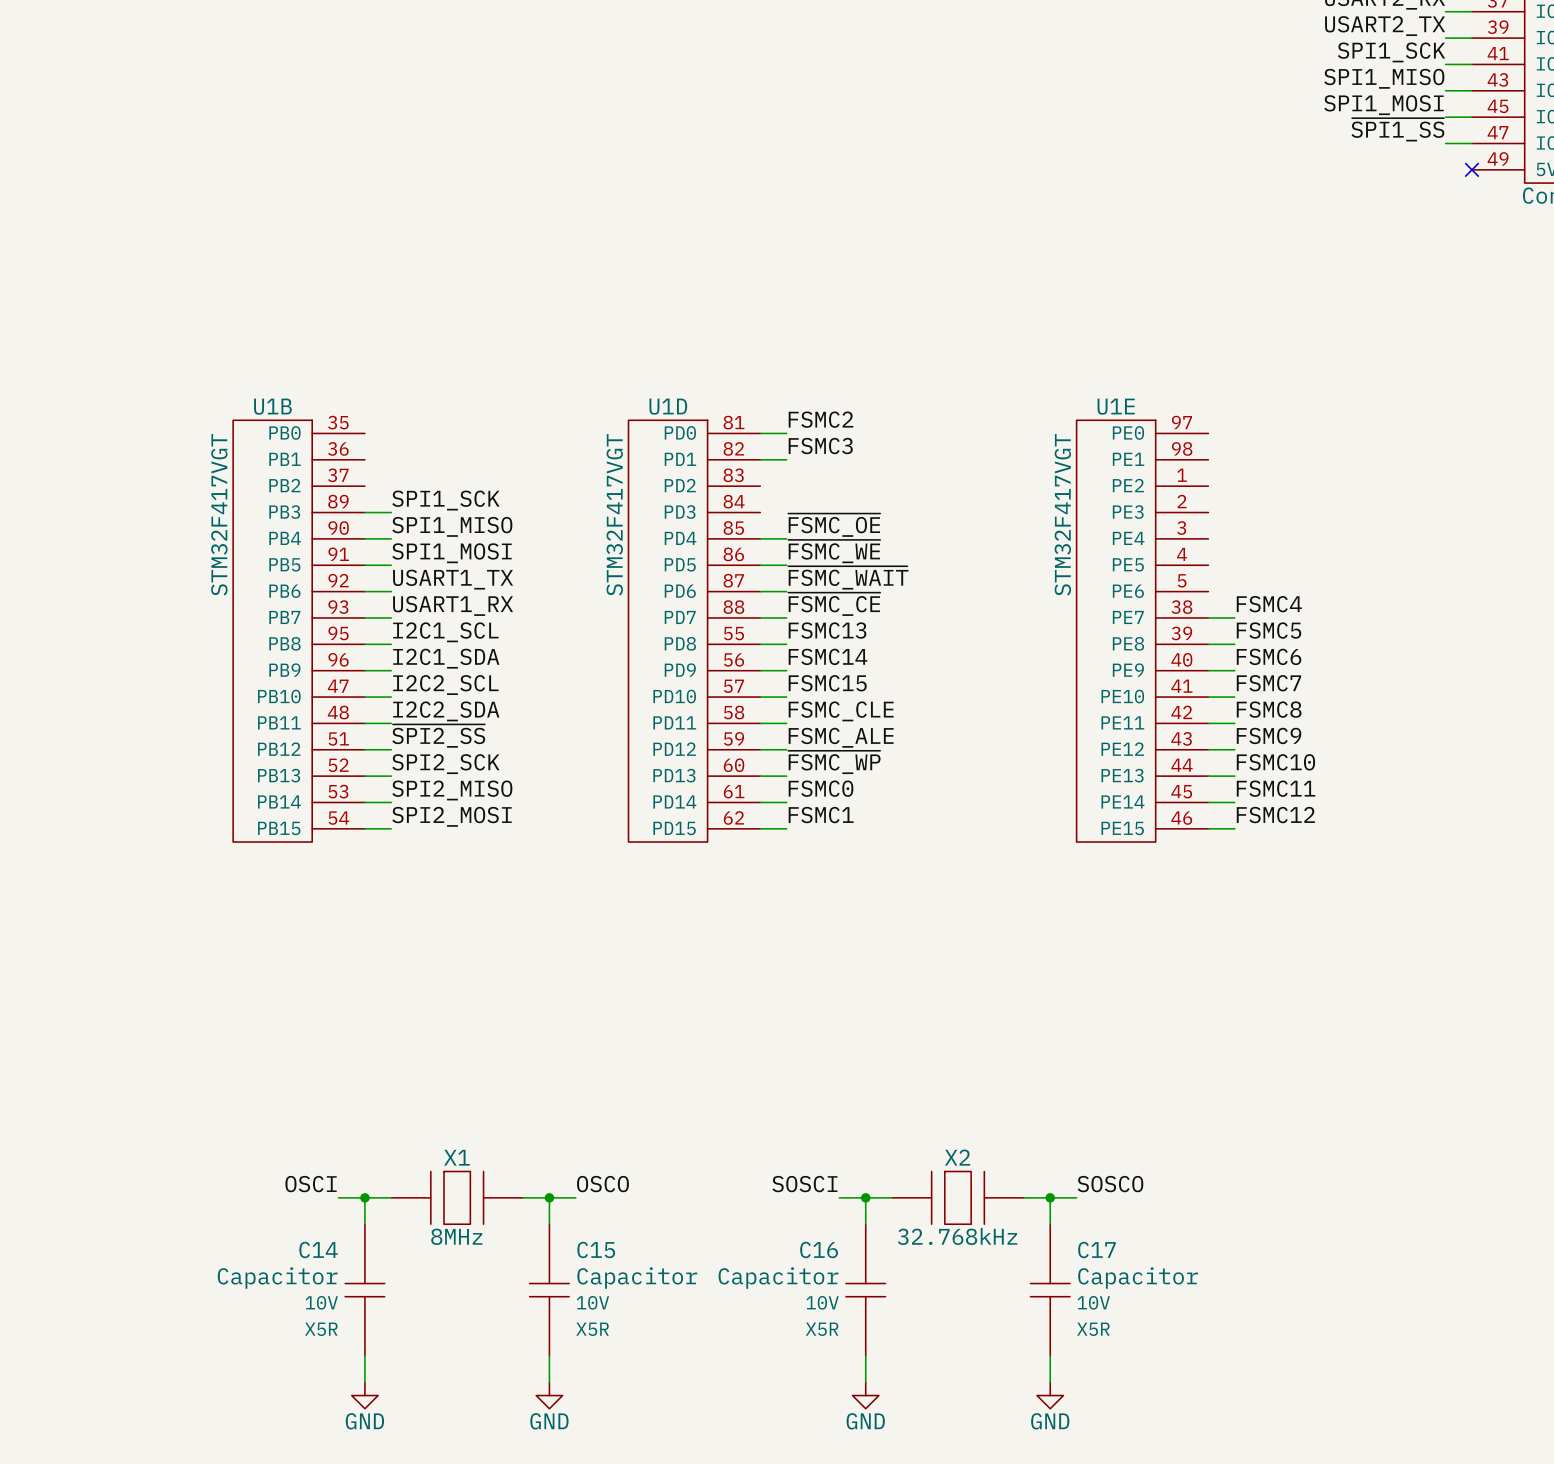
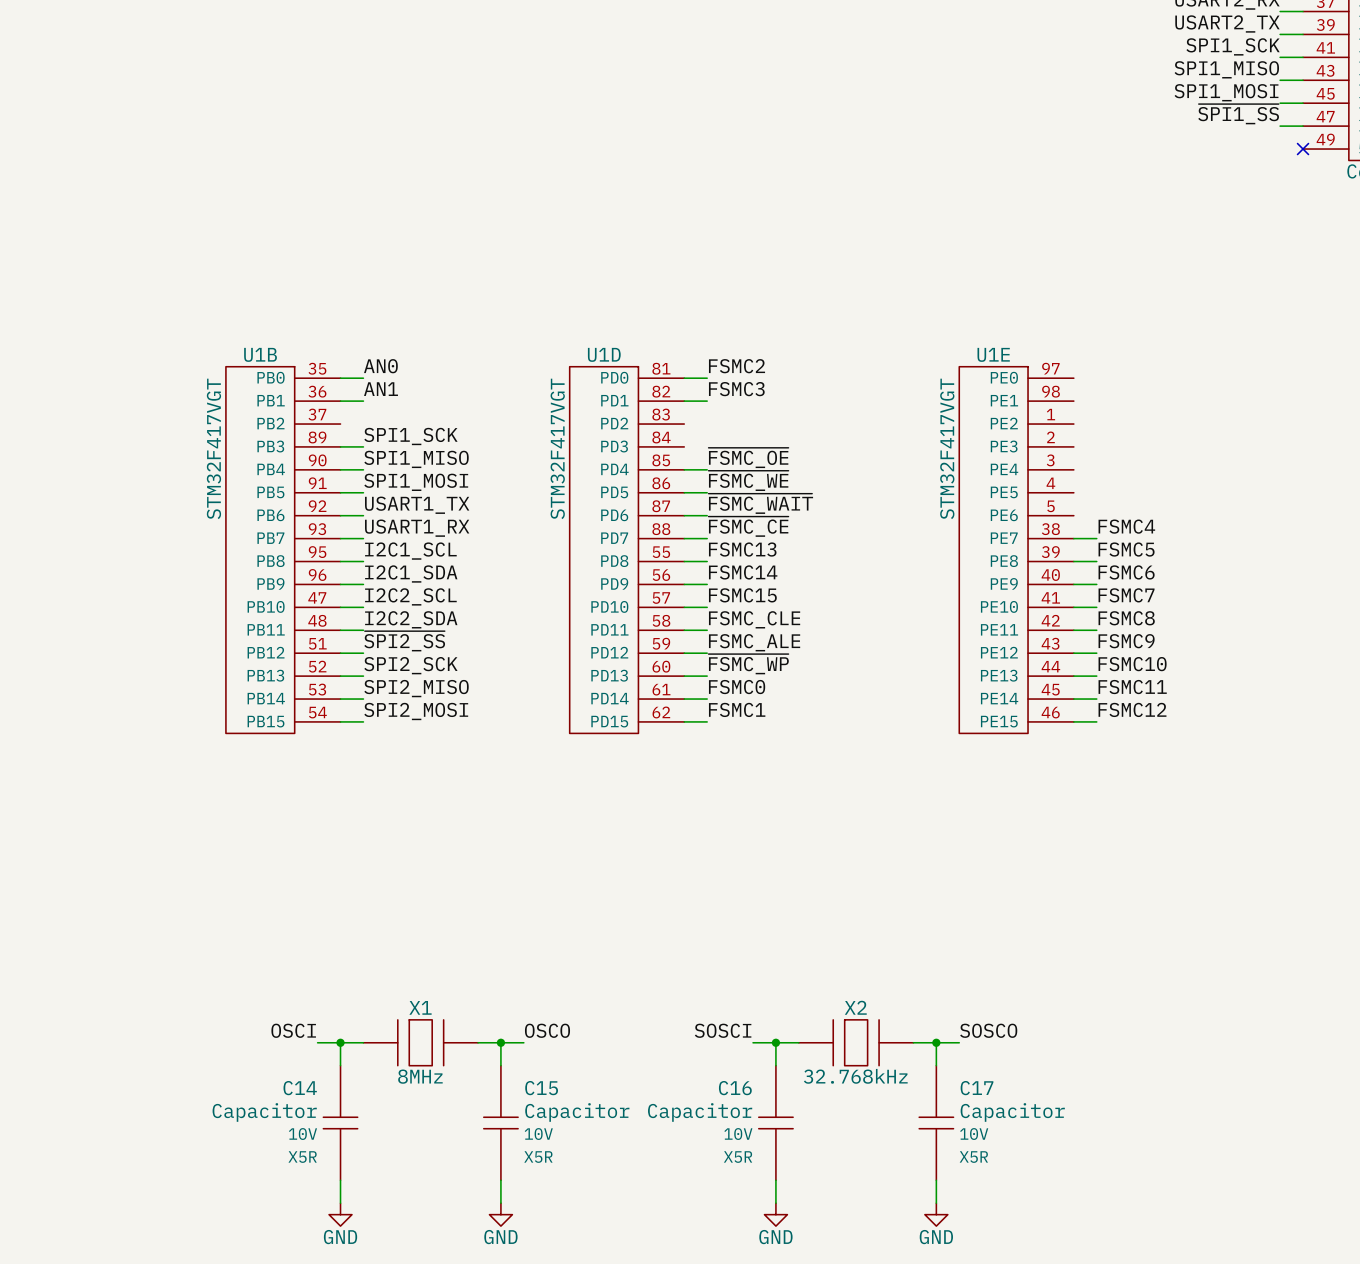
label: none -> AN0 (380, 366)
wire: none -> (340, 378) (363, 378)
label: none -> AN1 (381, 389)
wire: none -> (340, 401) (363, 401)

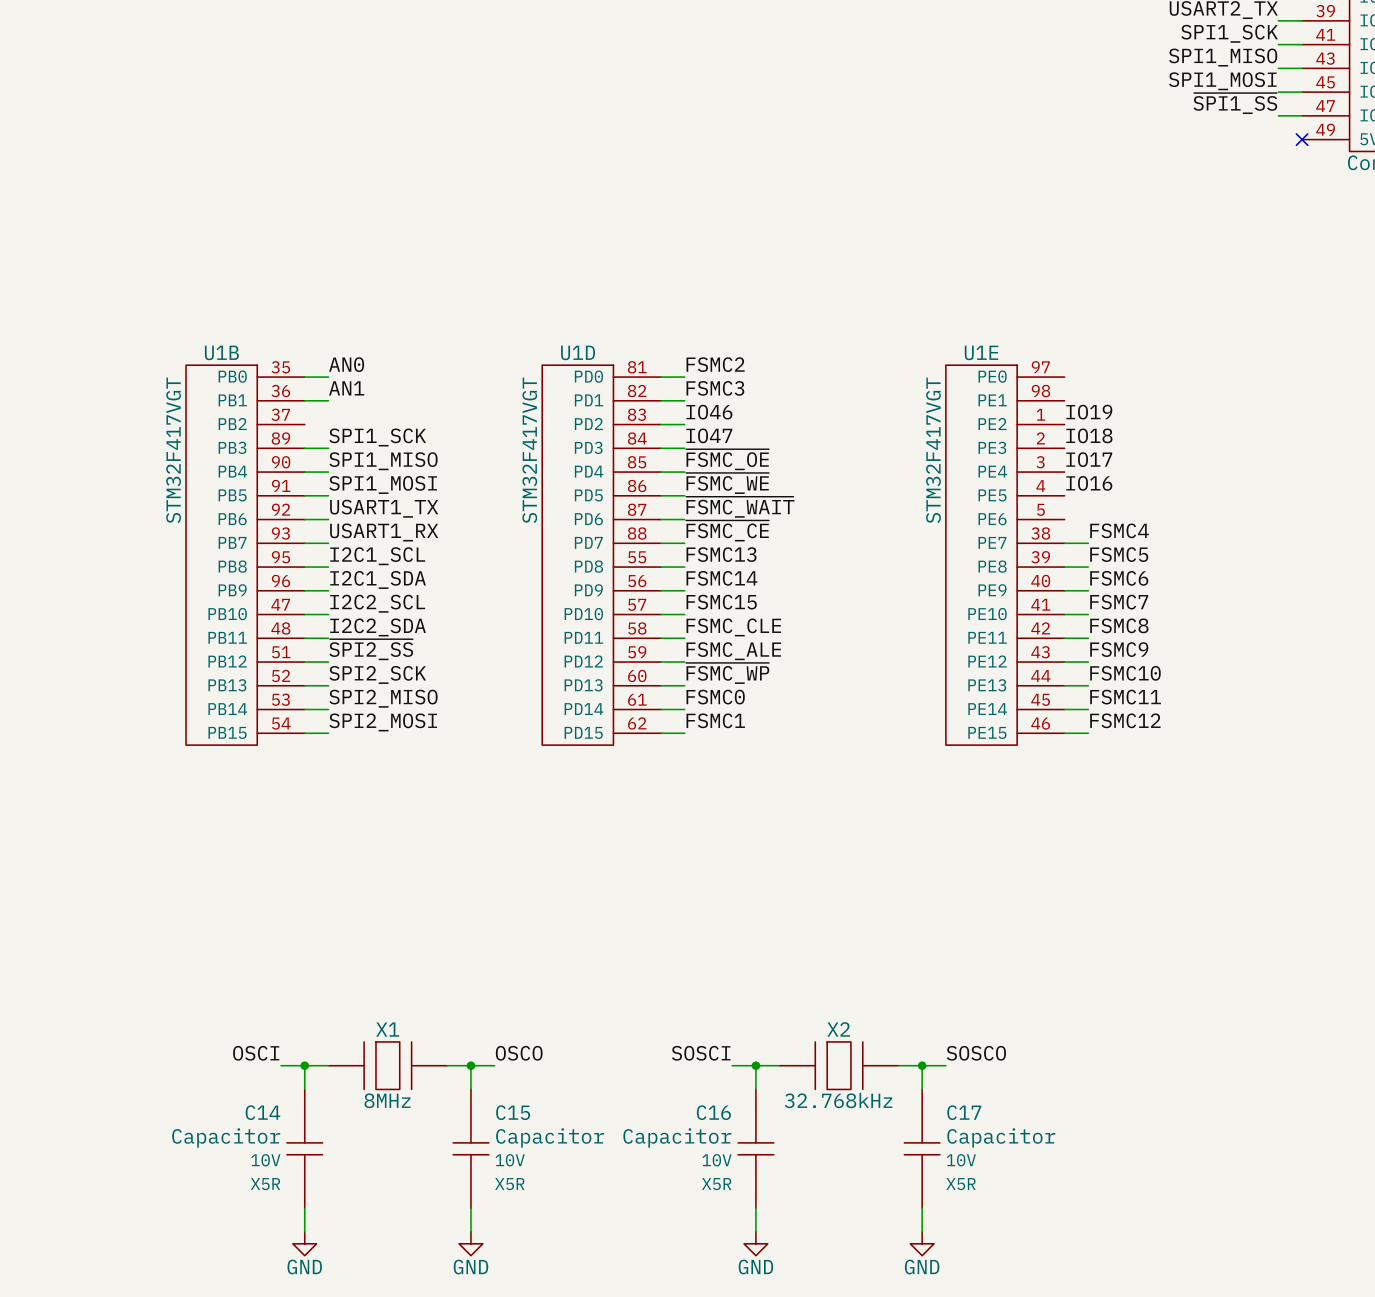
label: none -> IO46 (709, 412)
label: none -> IO19 (1089, 412)
wire: none -> (660, 424) (684, 424)
label: none -> IO47 (709, 435)
label: none -> IO18 (1089, 435)
wire: none -> (660, 448) (684, 448)
label: none -> IO17 (1089, 459)
label: none -> IO16 (1089, 483)

